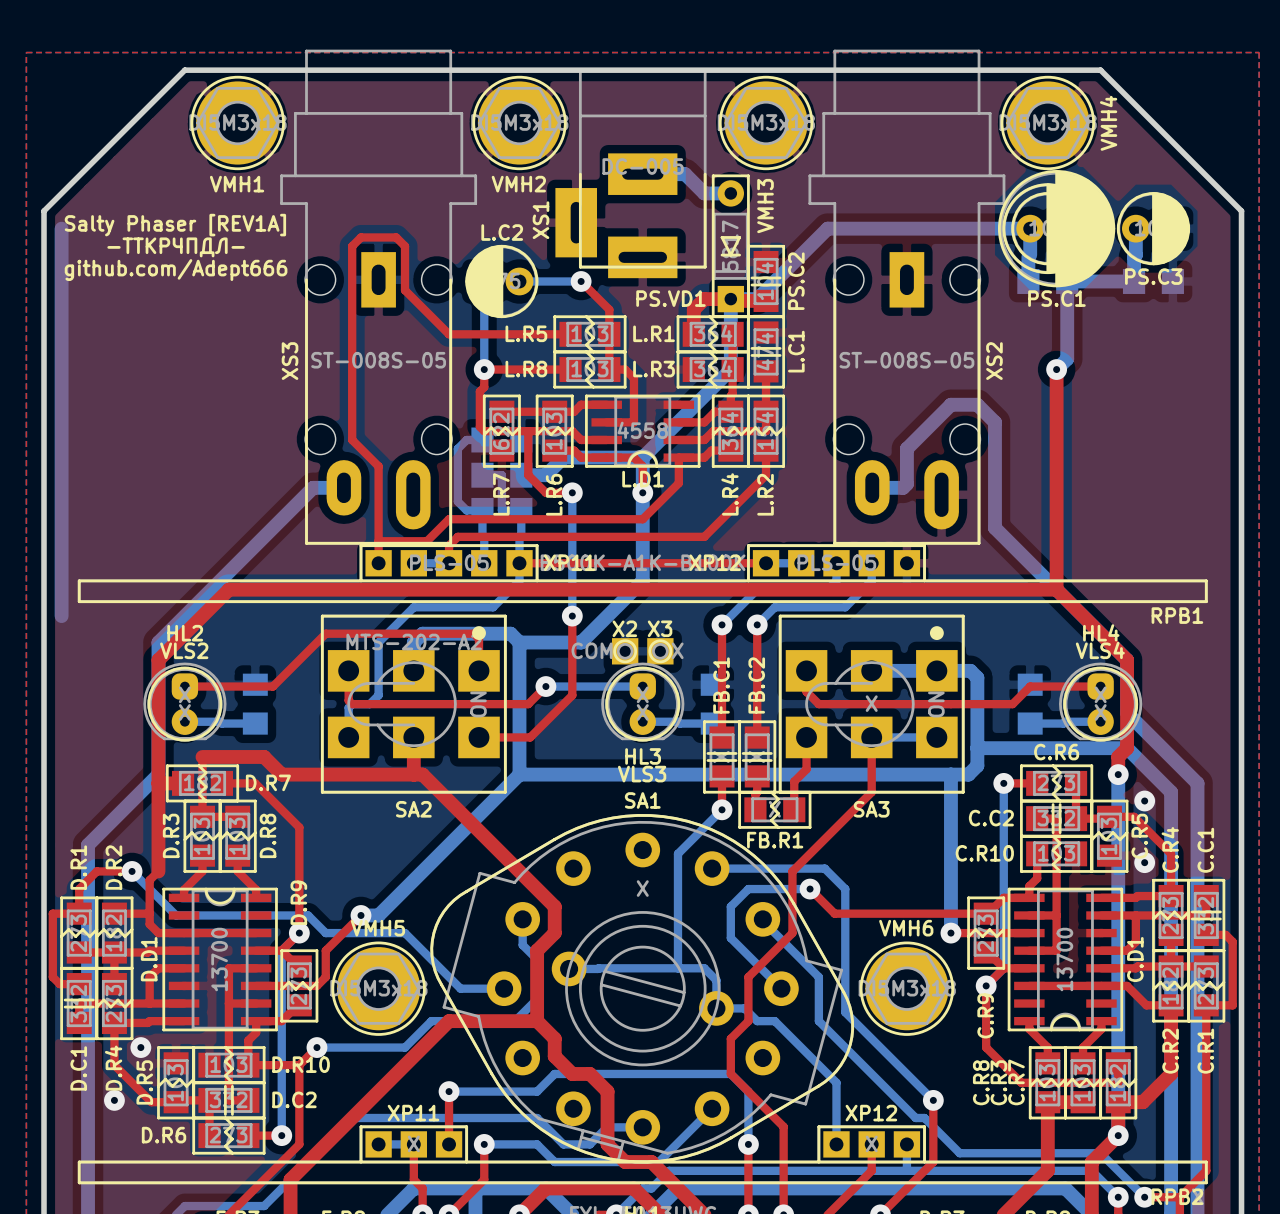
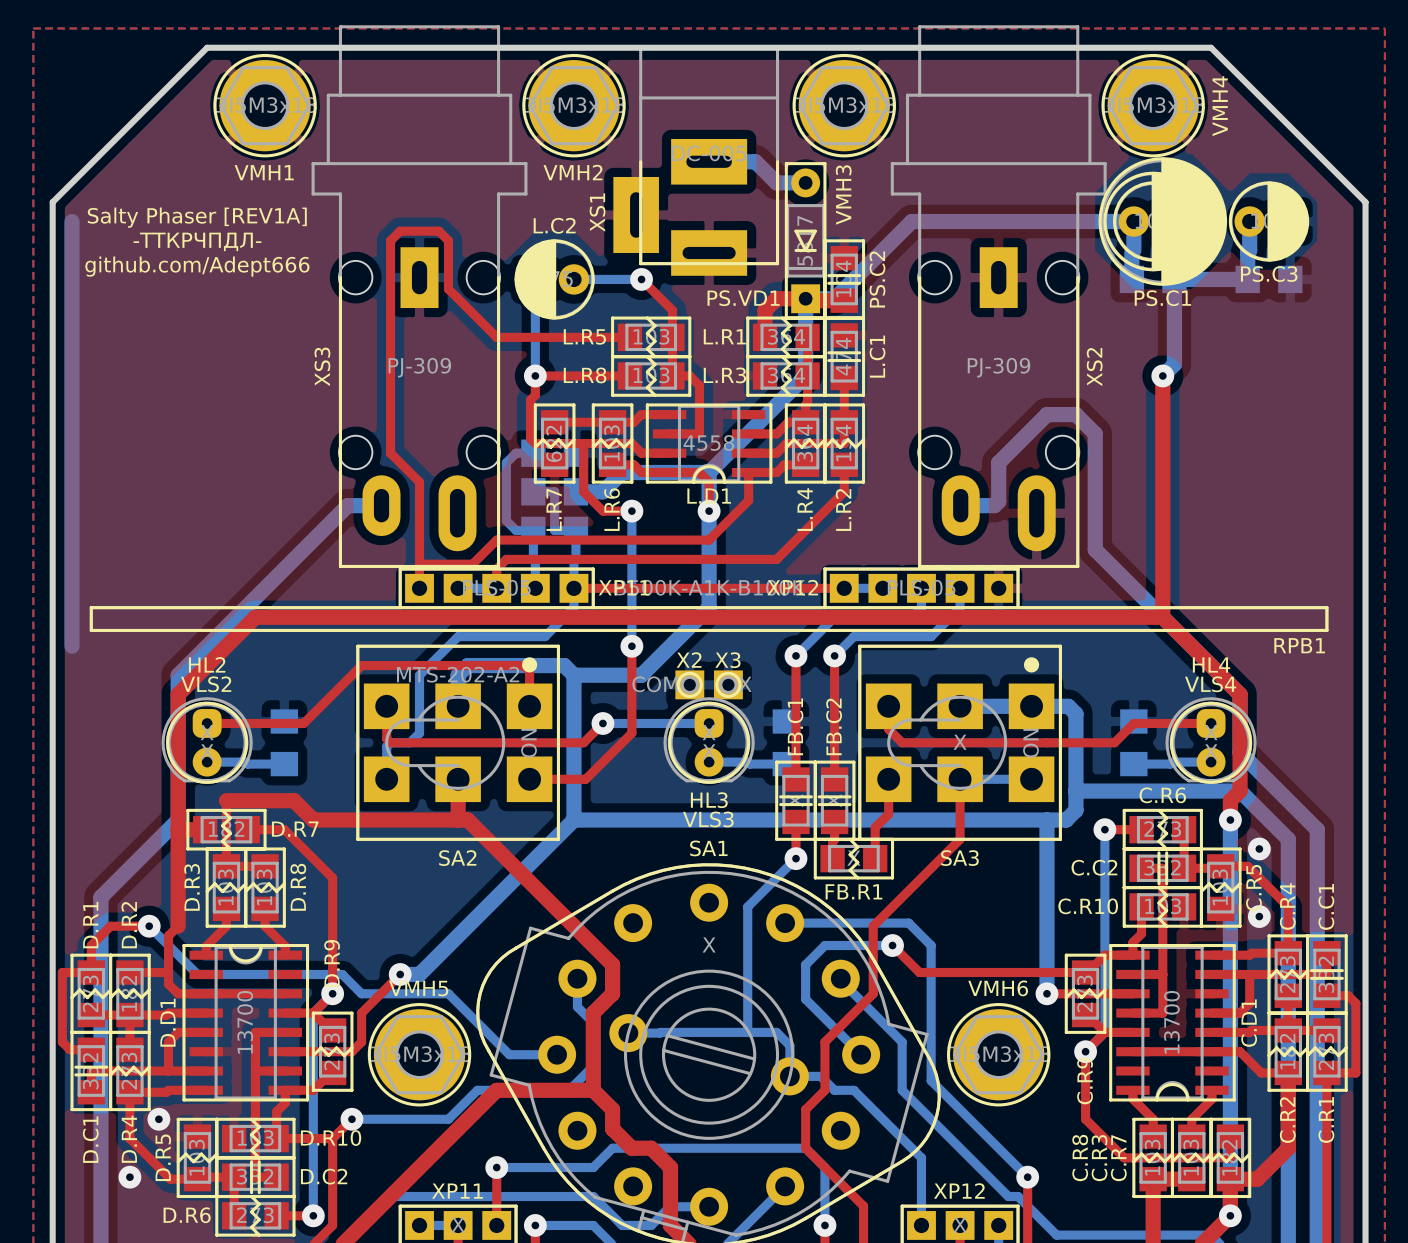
XS3 value: ST-008S-05 (378, 360) -> PJ-309 (419, 367)
XS2 value: ST-008S-05 (906, 360) -> PJ-309 (999, 367)

